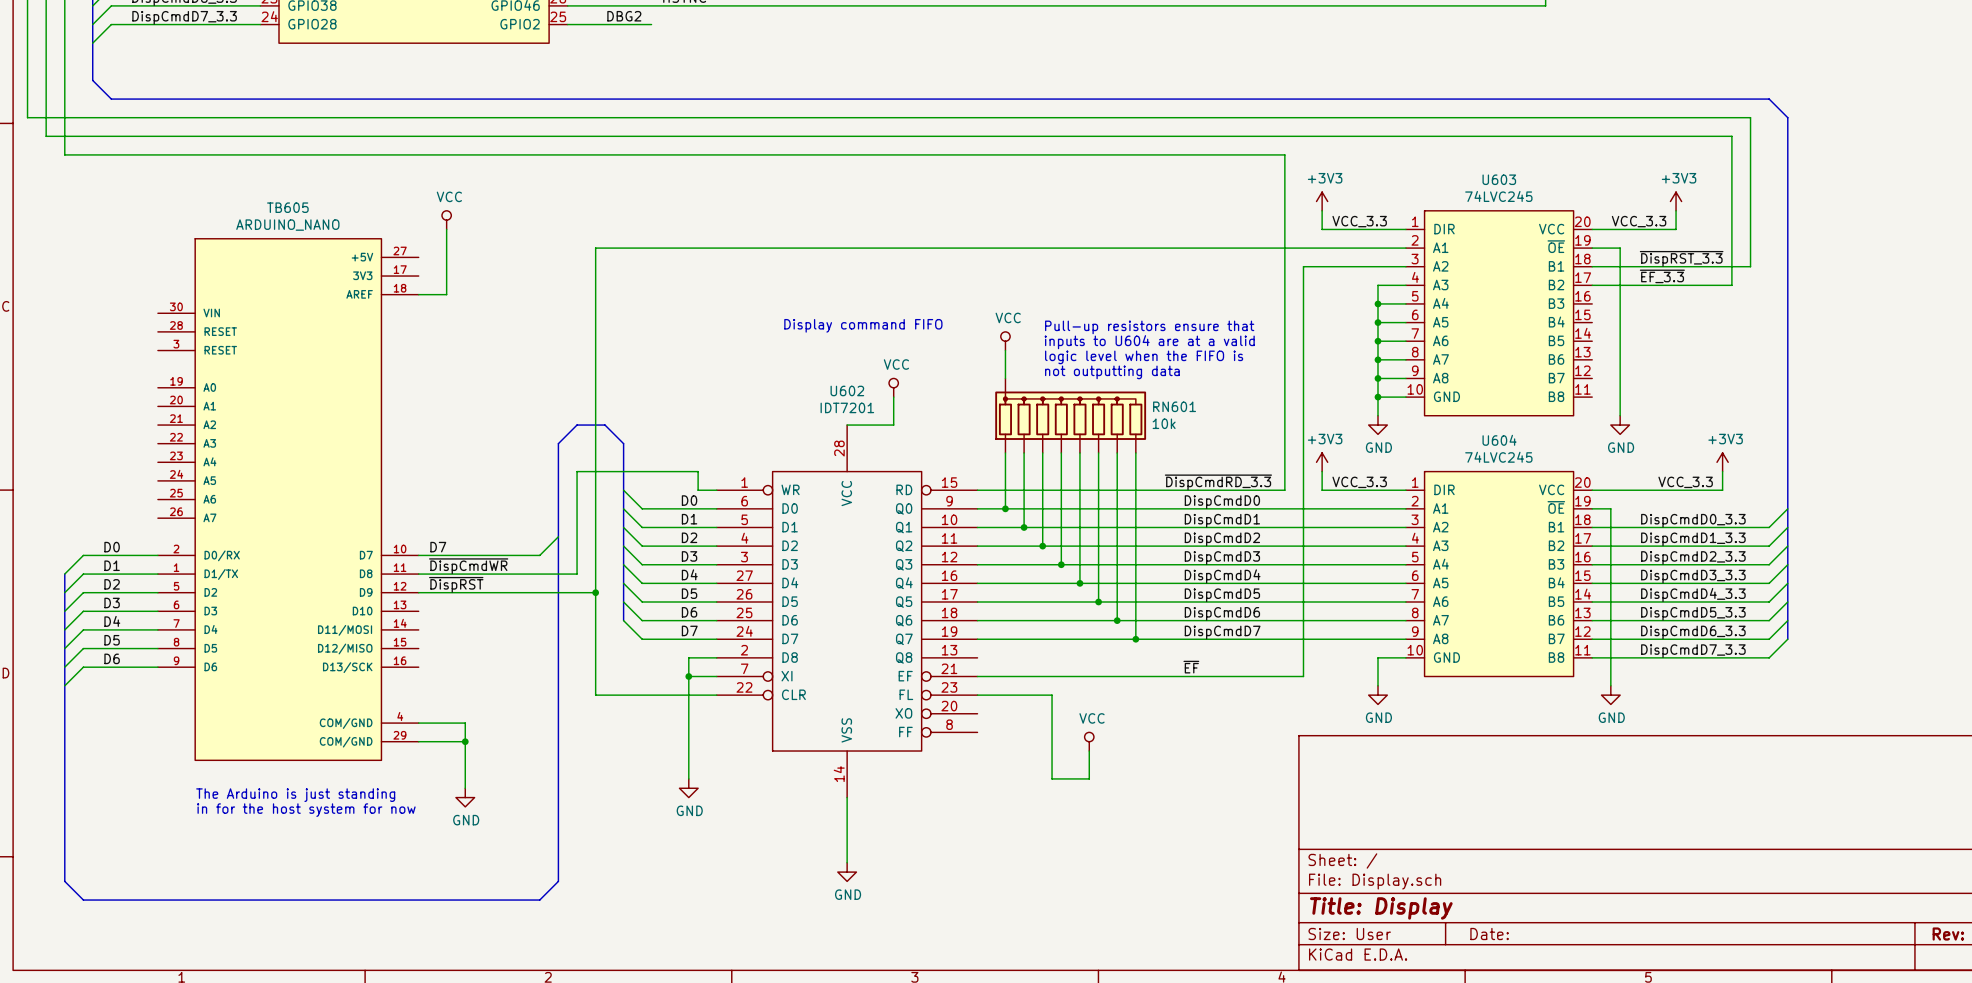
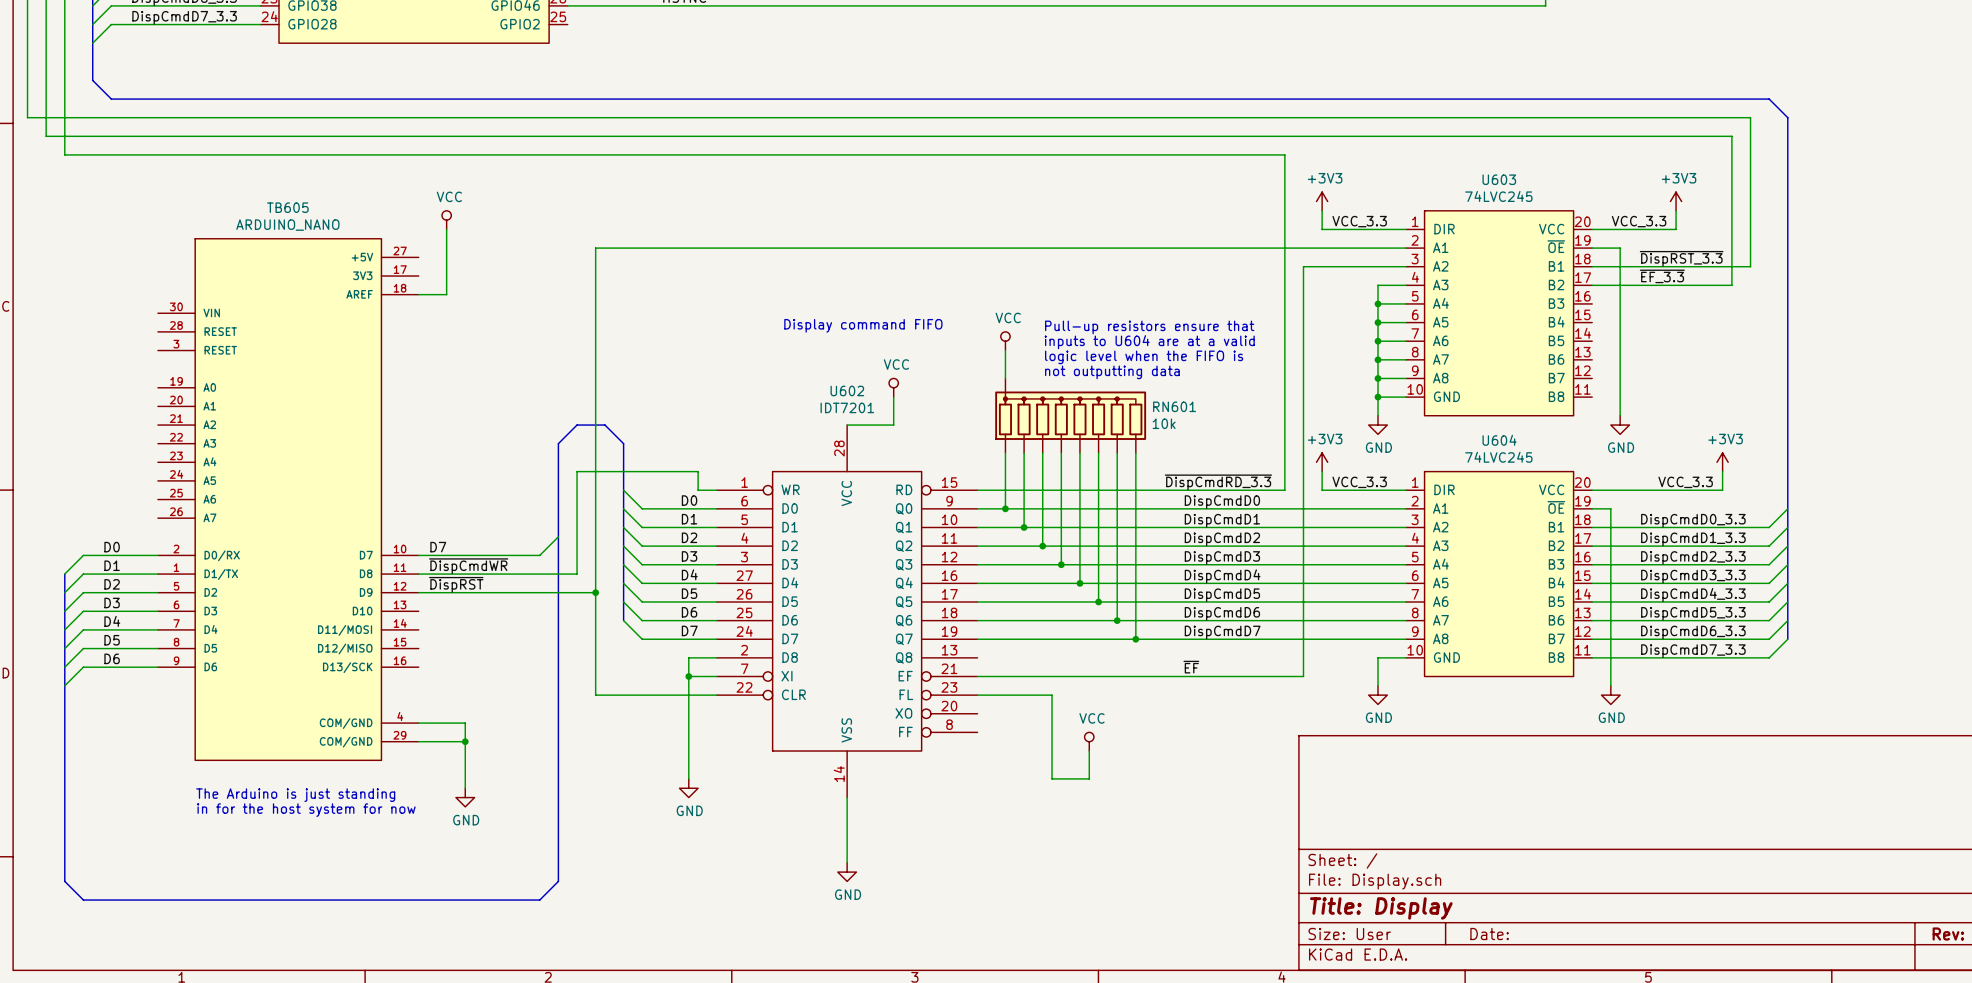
label: DBG2 (624, 16) -> none
wire: (567, 24) (651, 24) -> none

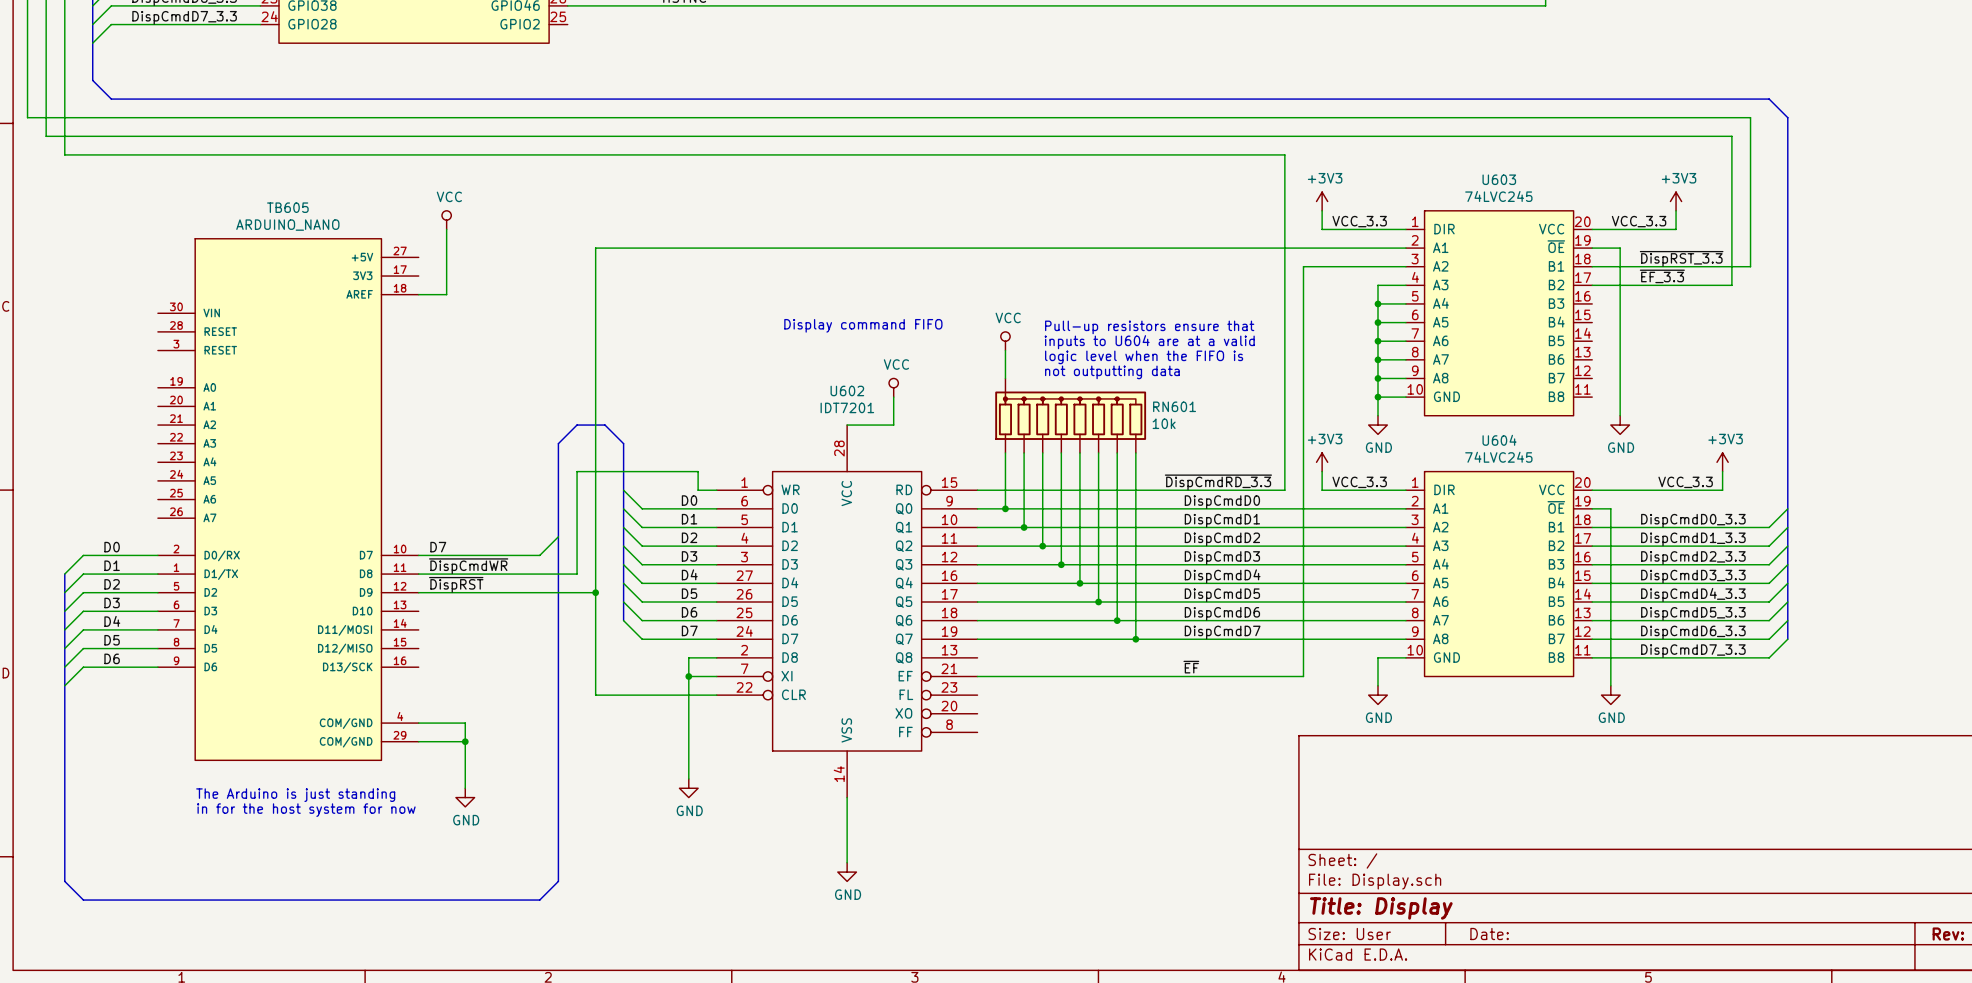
wire: (977, 695) (1052, 695) (1052, 778) (1089, 778) (1089, 751) -> none
power symbol: VCC (1089, 741) -> none

